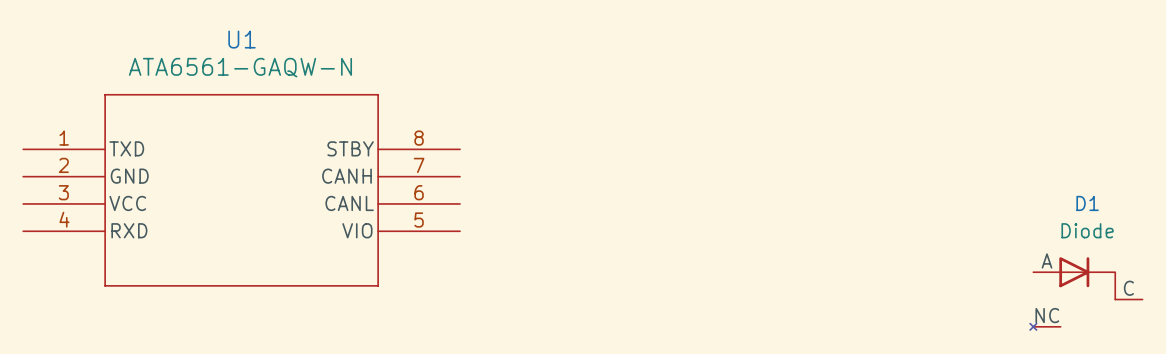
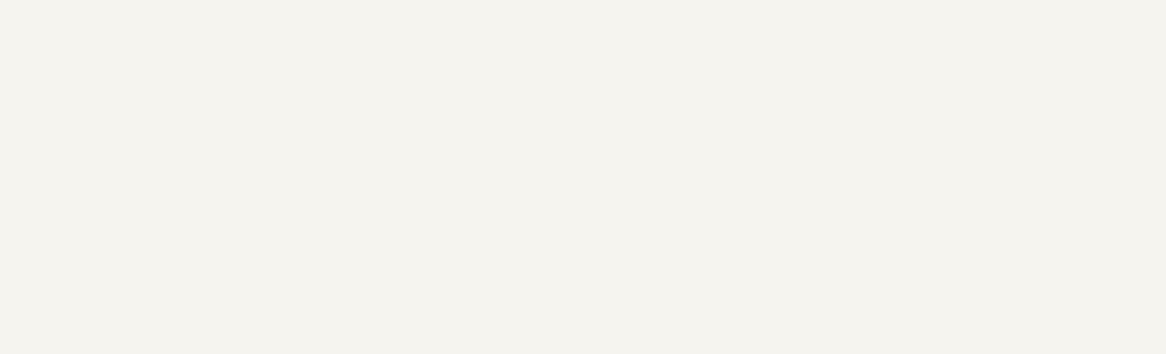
U1: ATA6561-GAQW-N (241, 190) -> none
D1: Diode (1086, 293) -> none

